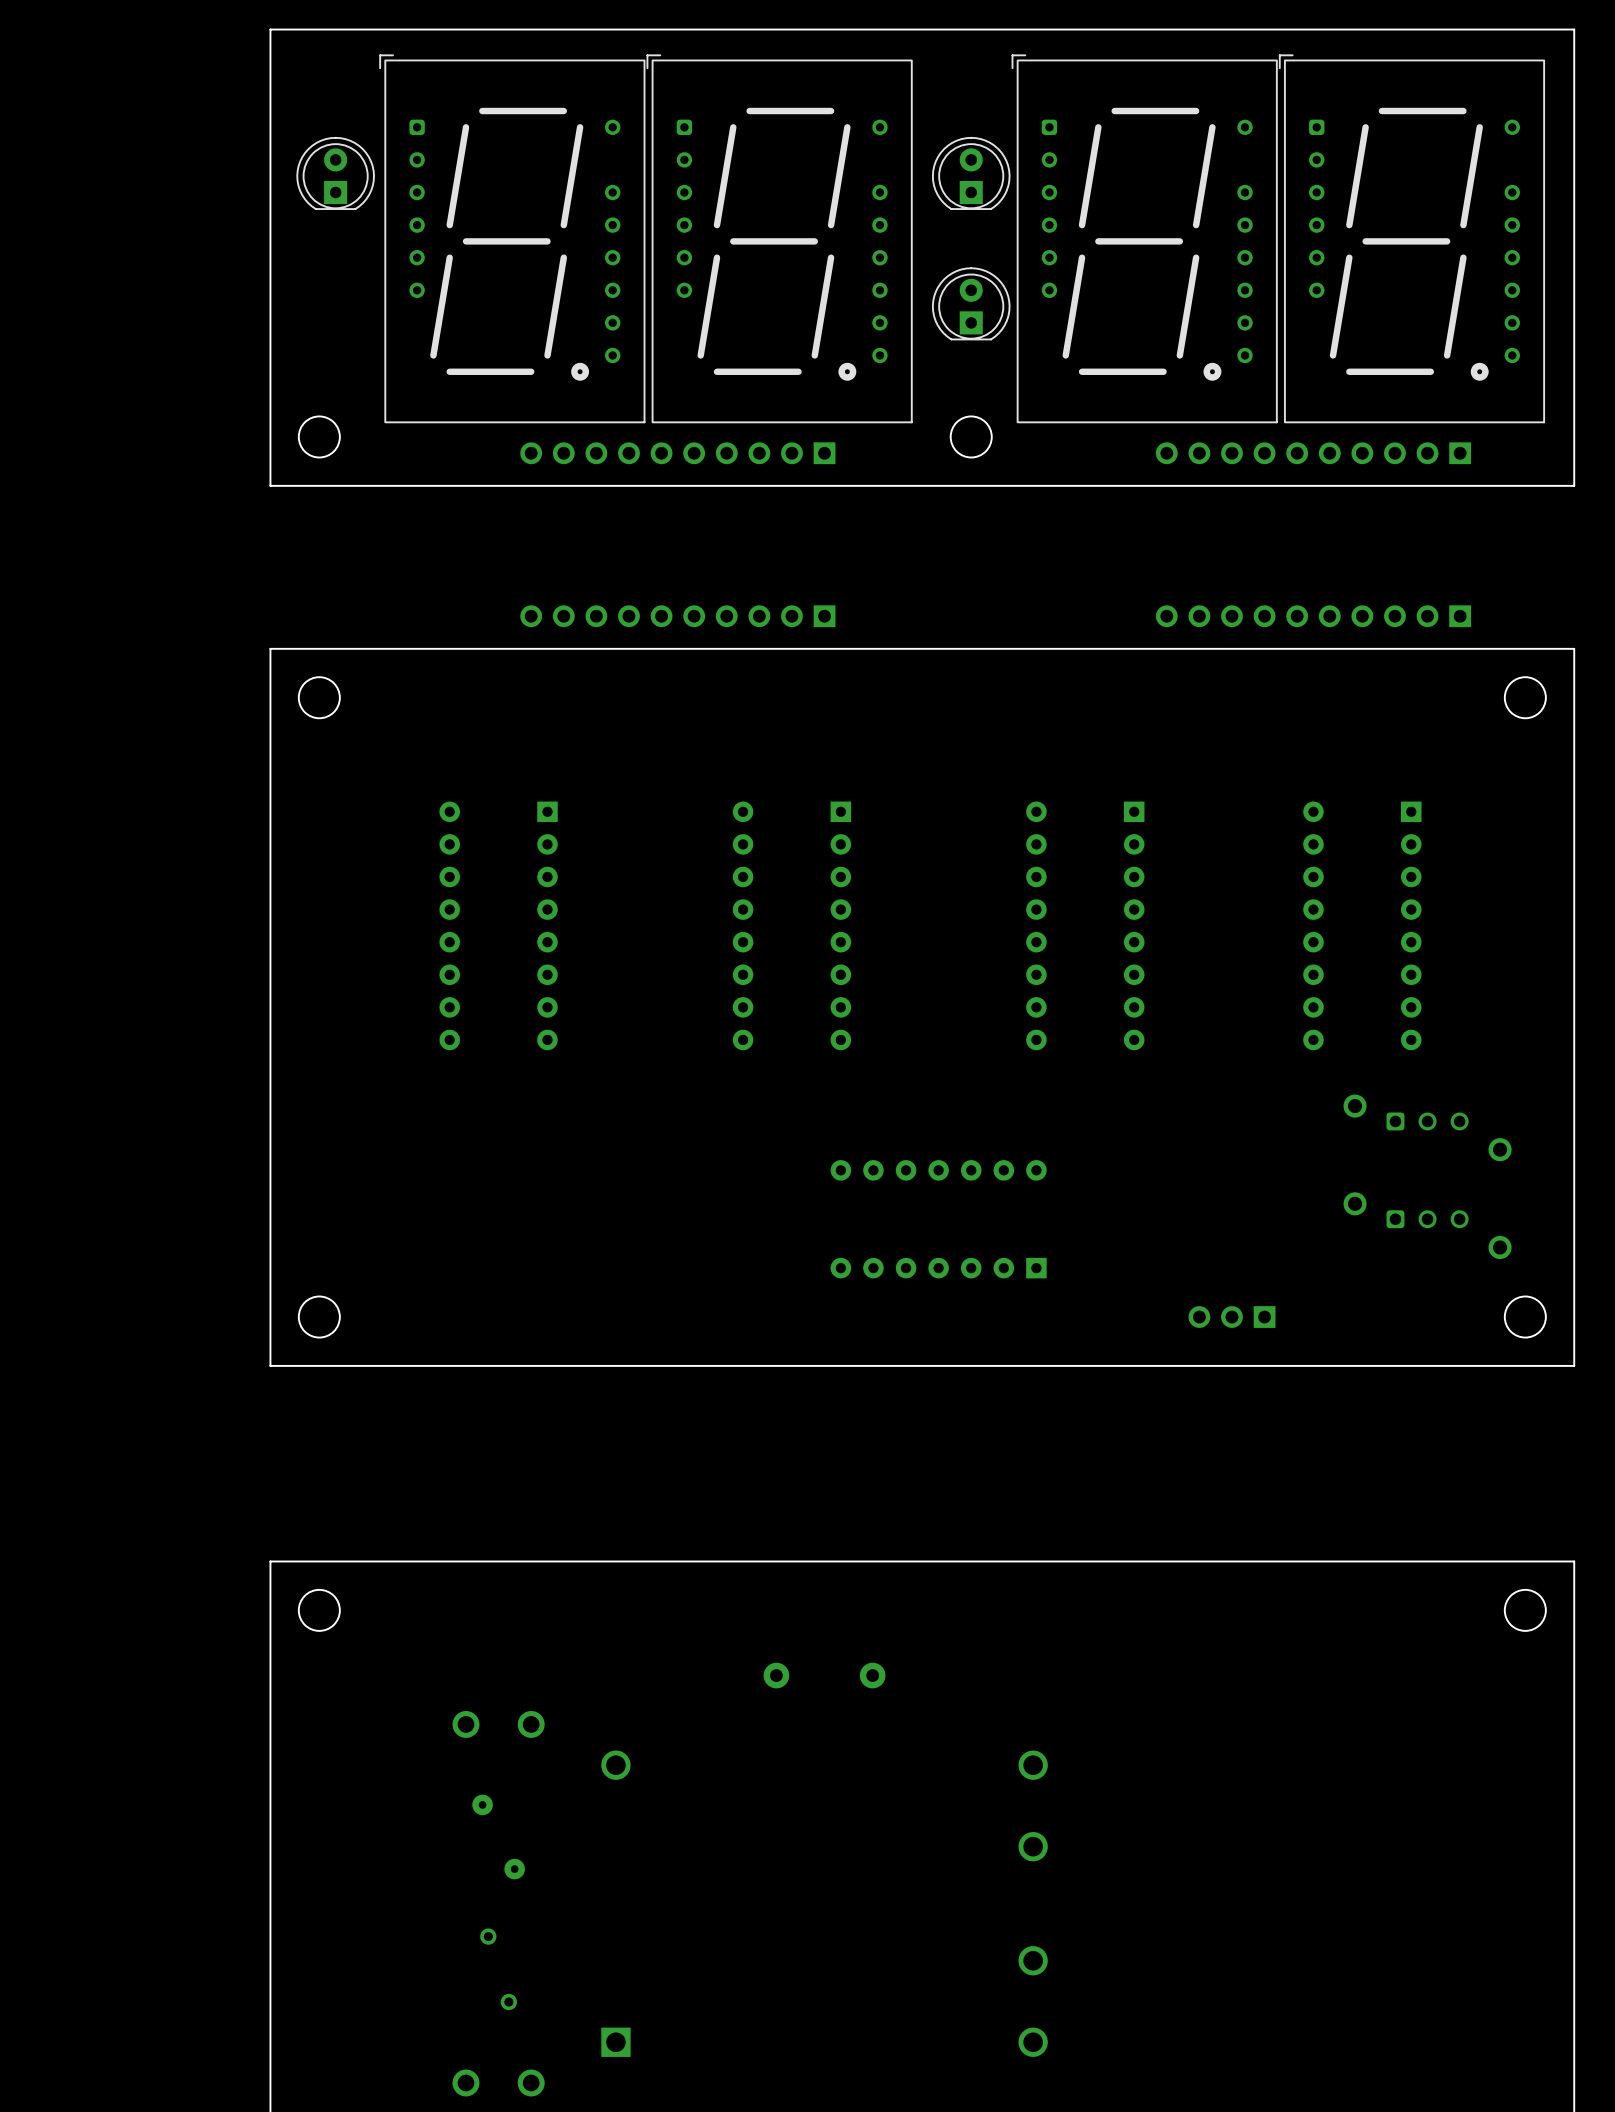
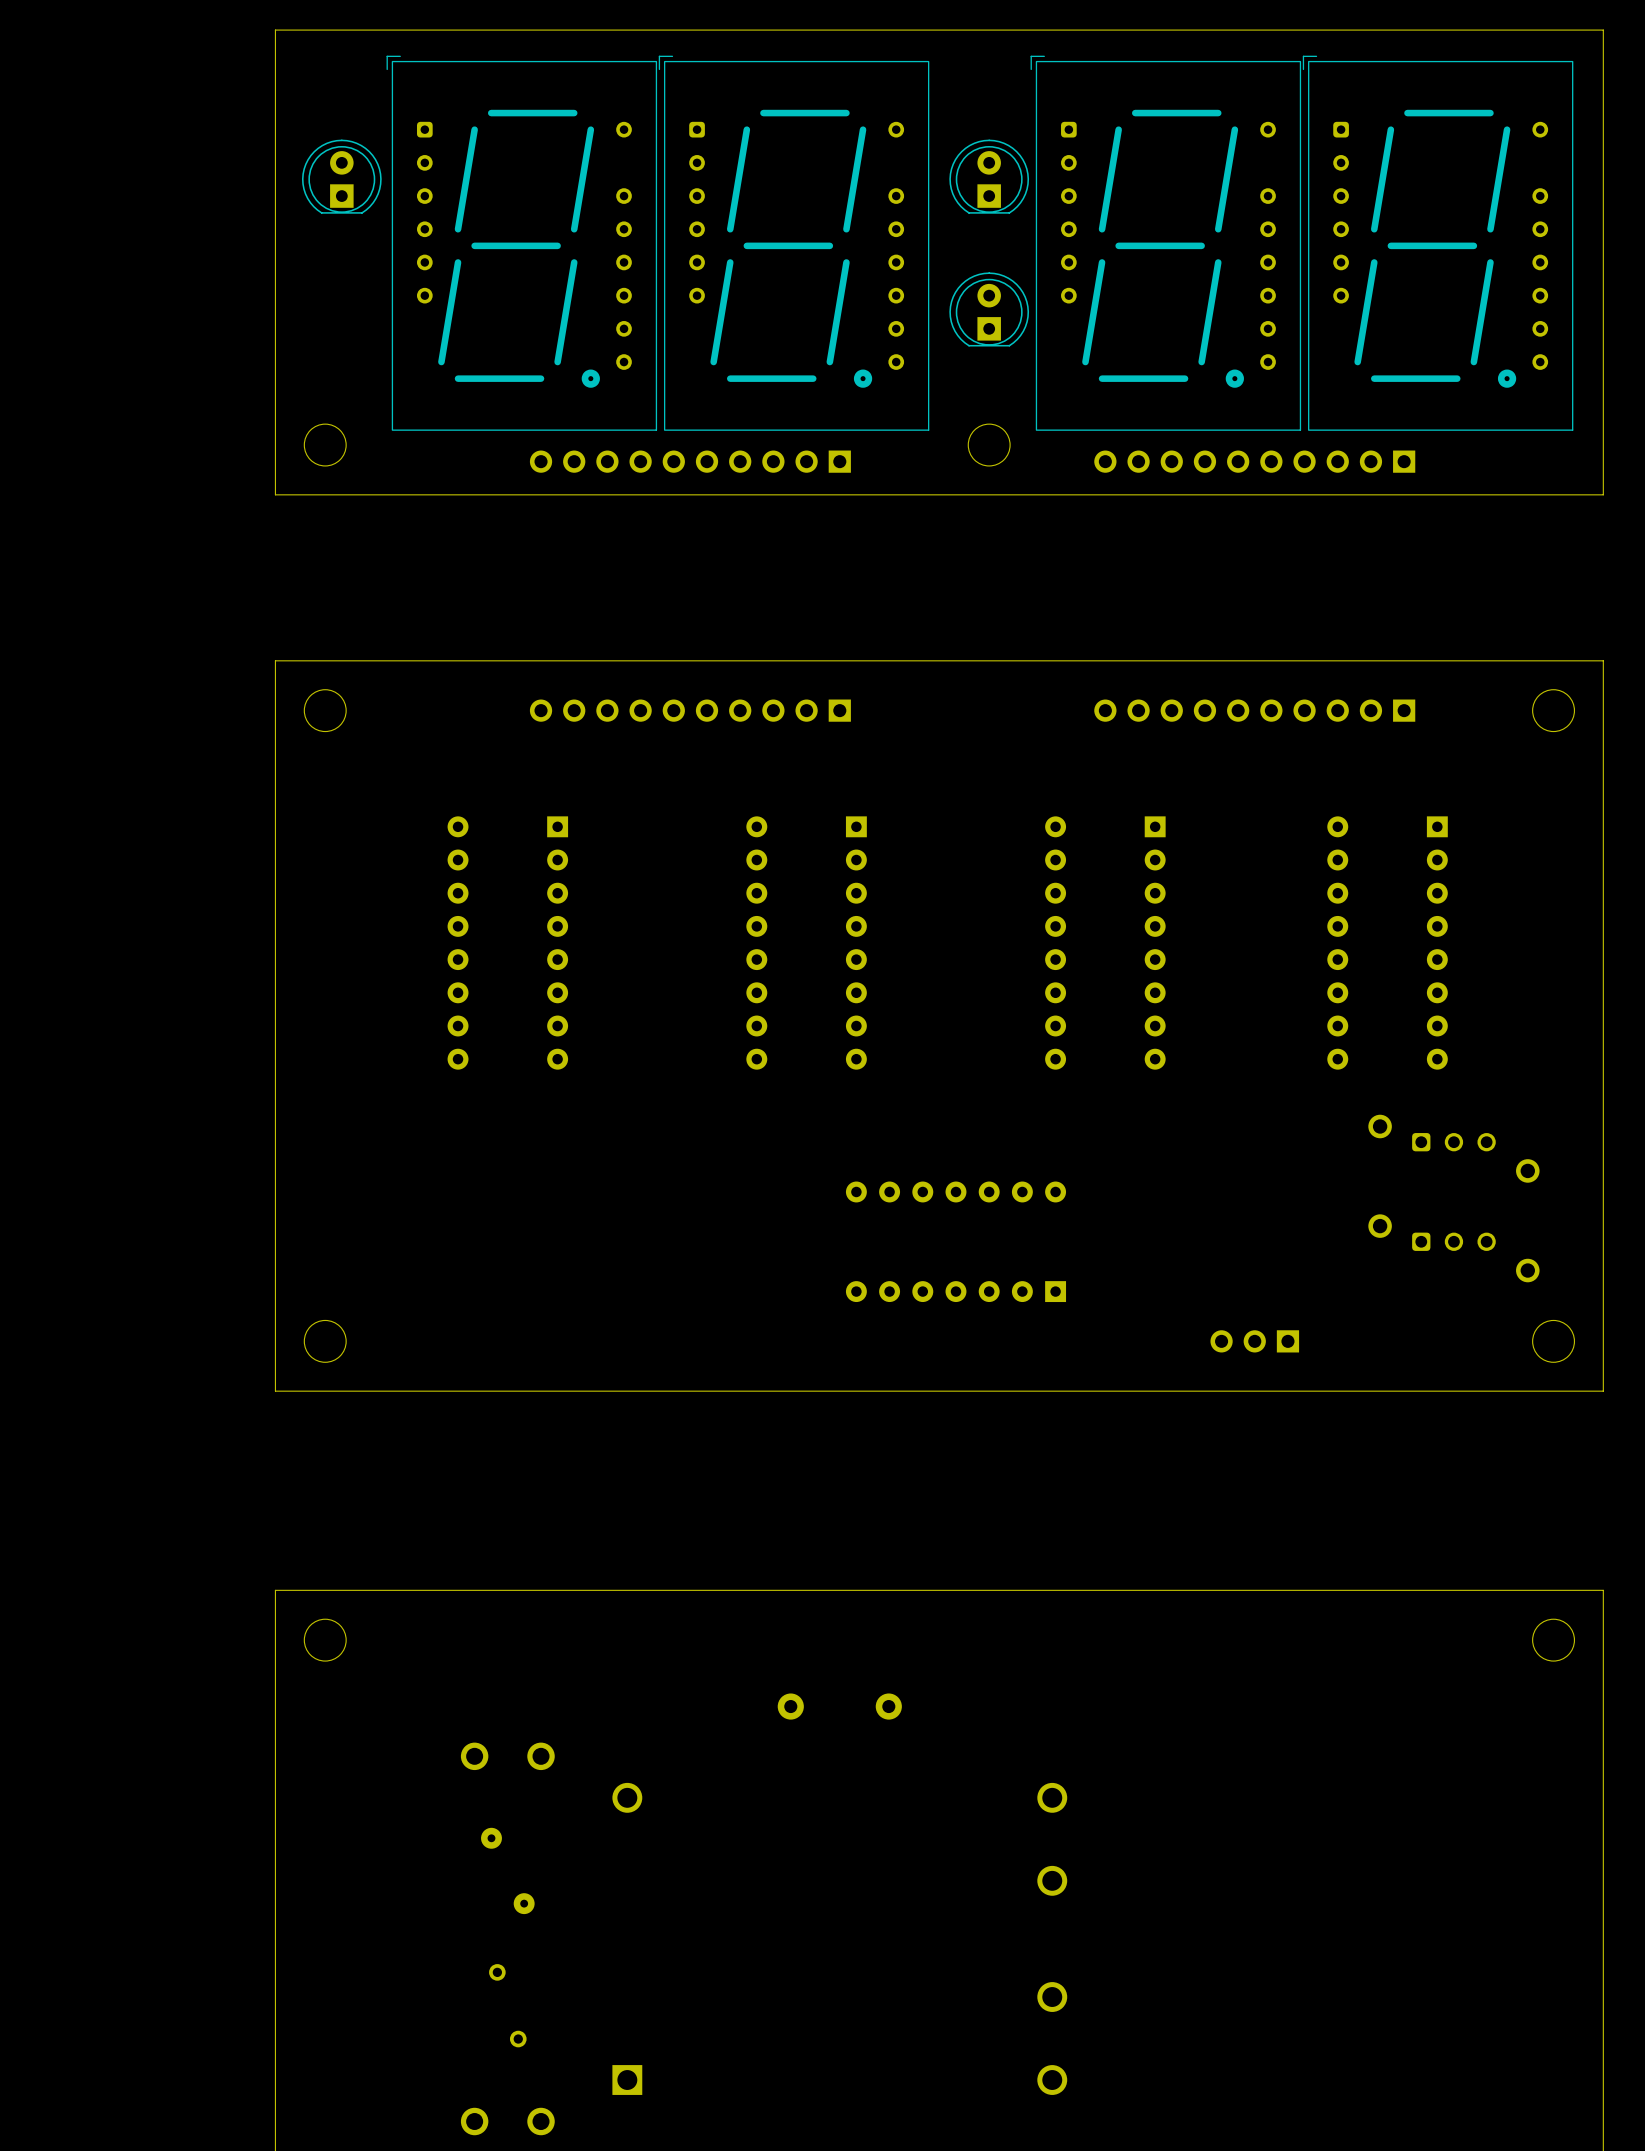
part position: (1313, 453) -> (1254, 461)
part position: (677, 616) -> (690, 710)
part: (1313, 616) -> none
part: none -> (1254, 710)

